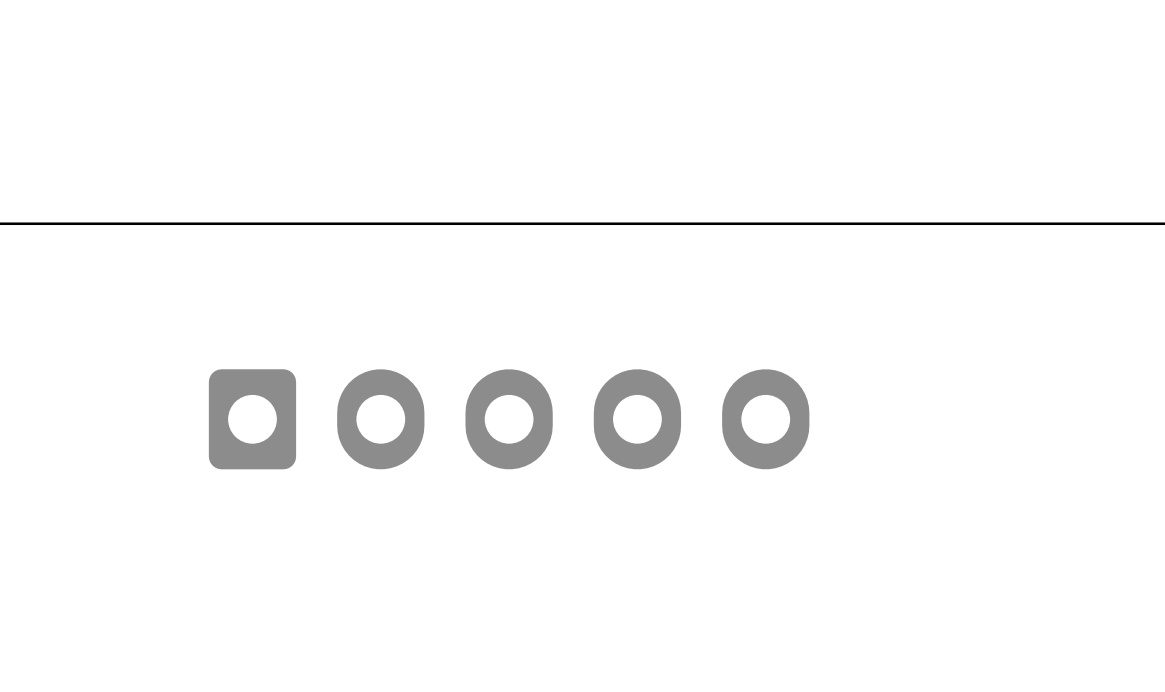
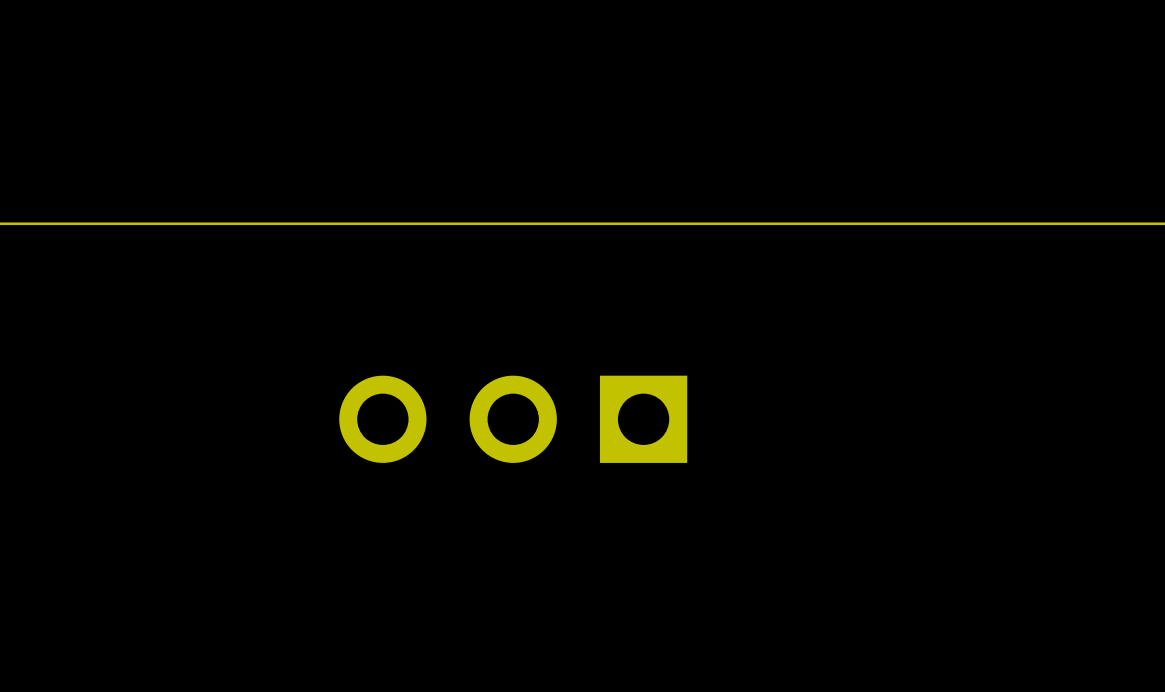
part footprint: [208, 369, 810, 470] -> [339, 375, 688, 463]

